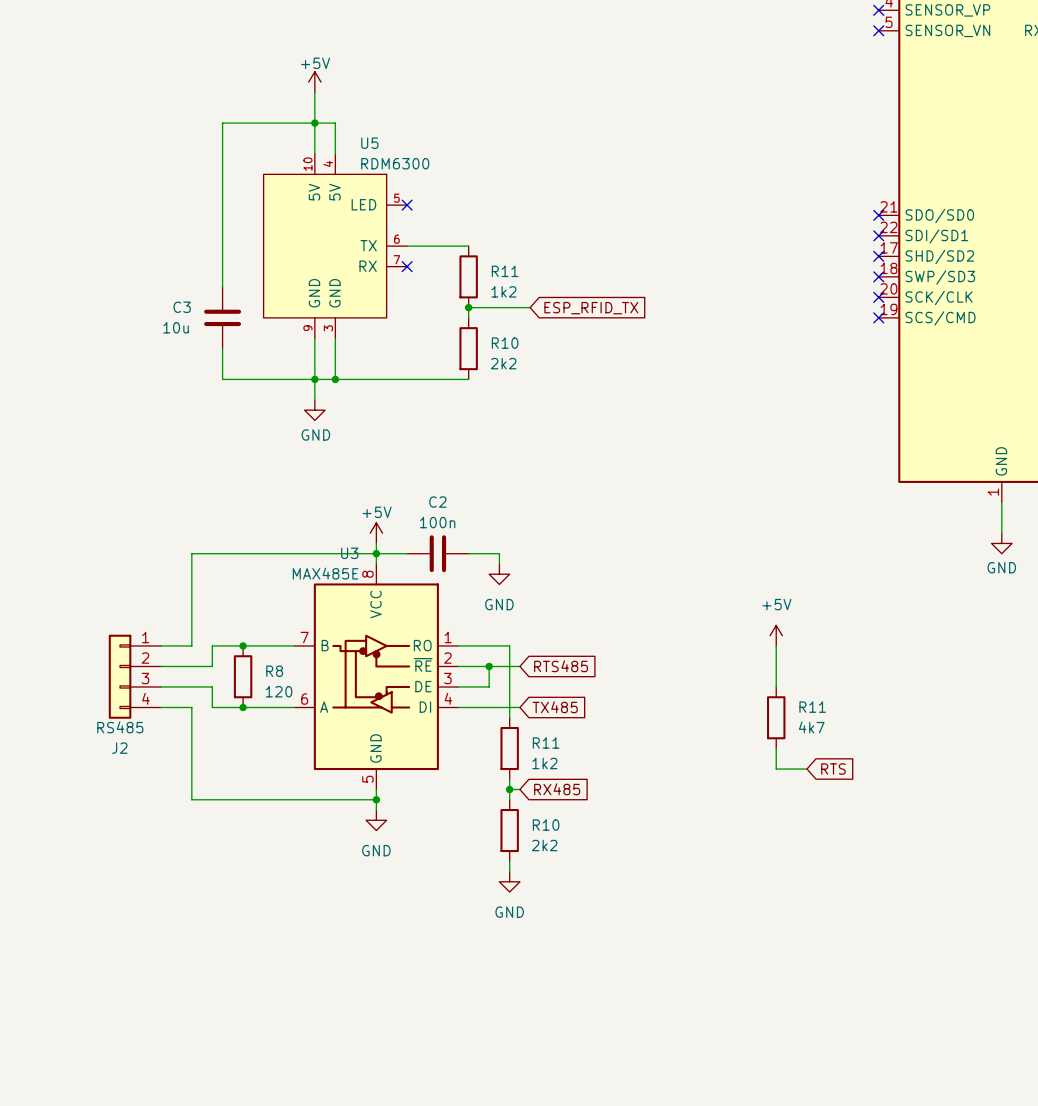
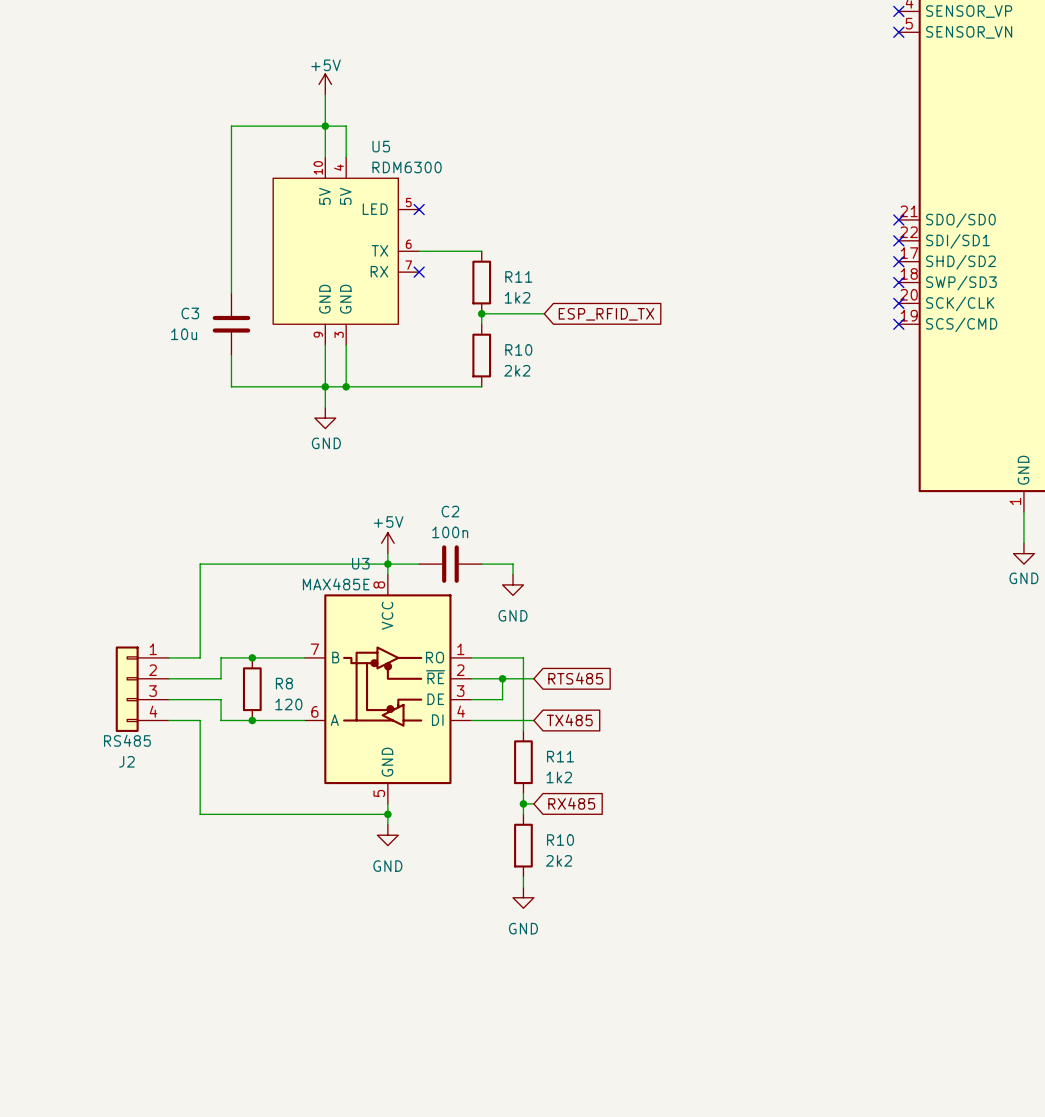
power symbol: +5V (776, 635) -> none
wire: (776, 645) (776, 686) -> none
R11: 4k7 (776, 717) -> none
wire: (776, 748) (776, 769) (807, 769) -> none
global label: RTS (833, 769) -> none

